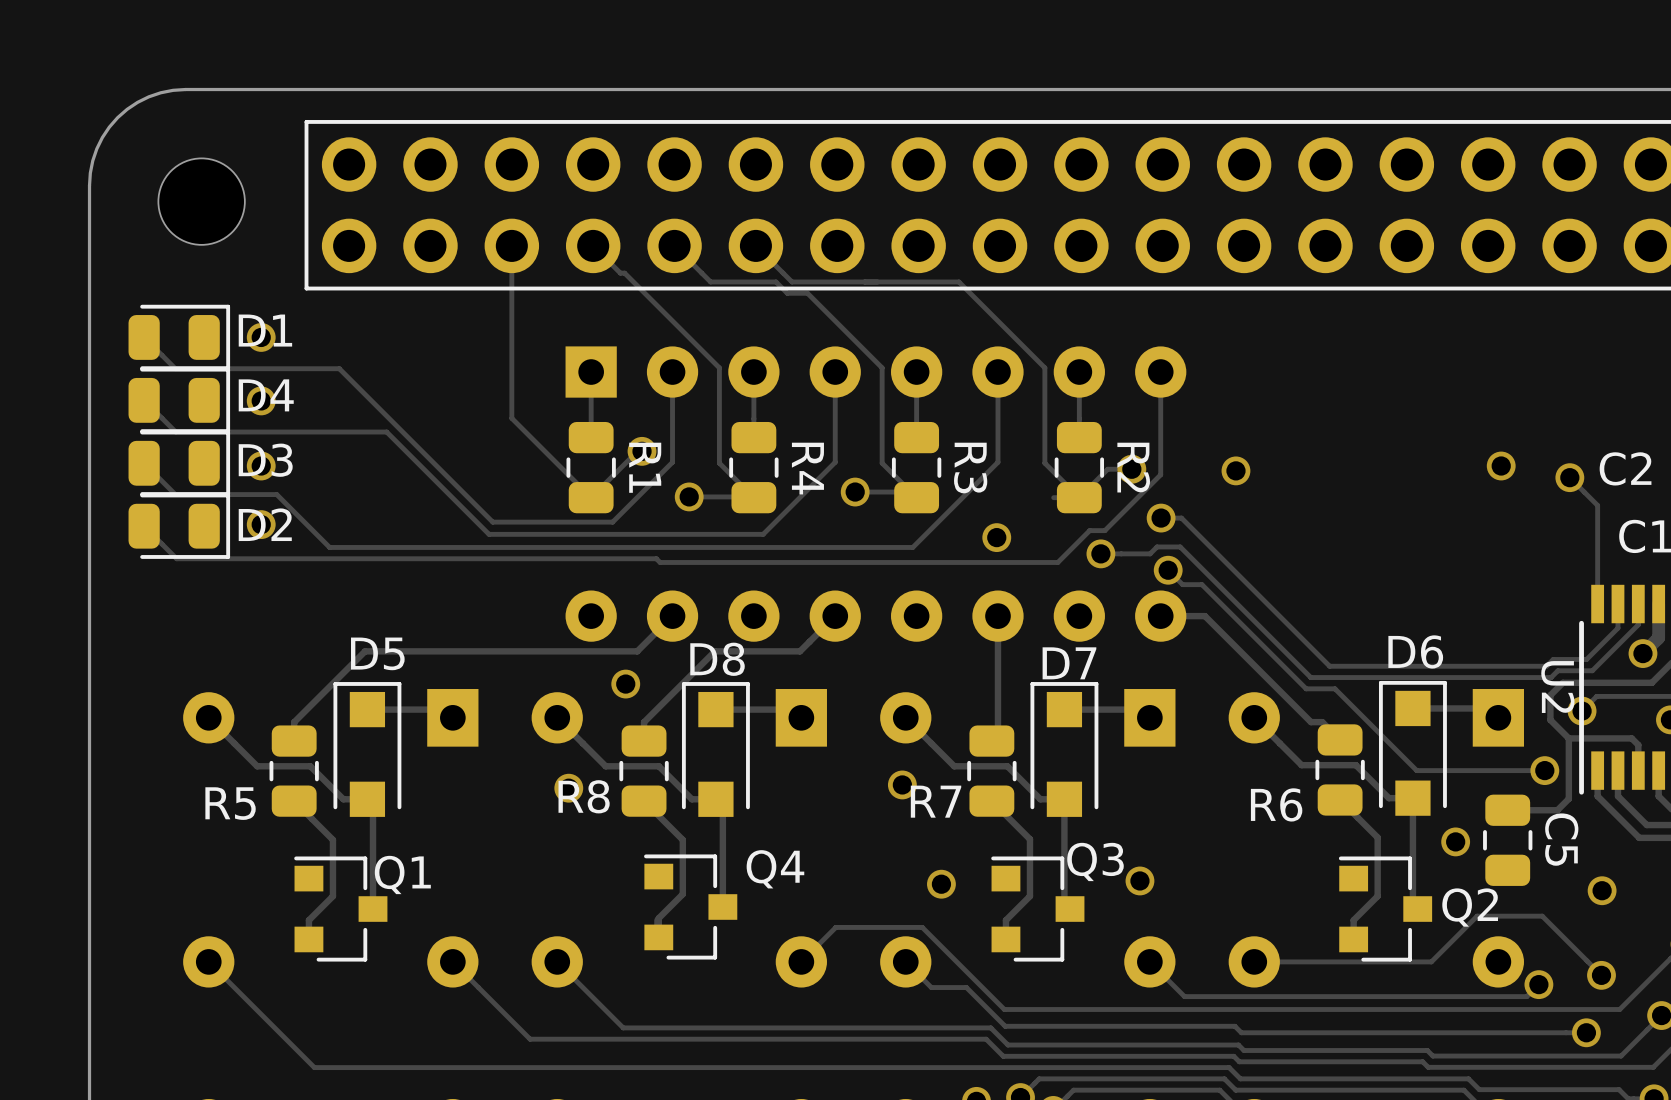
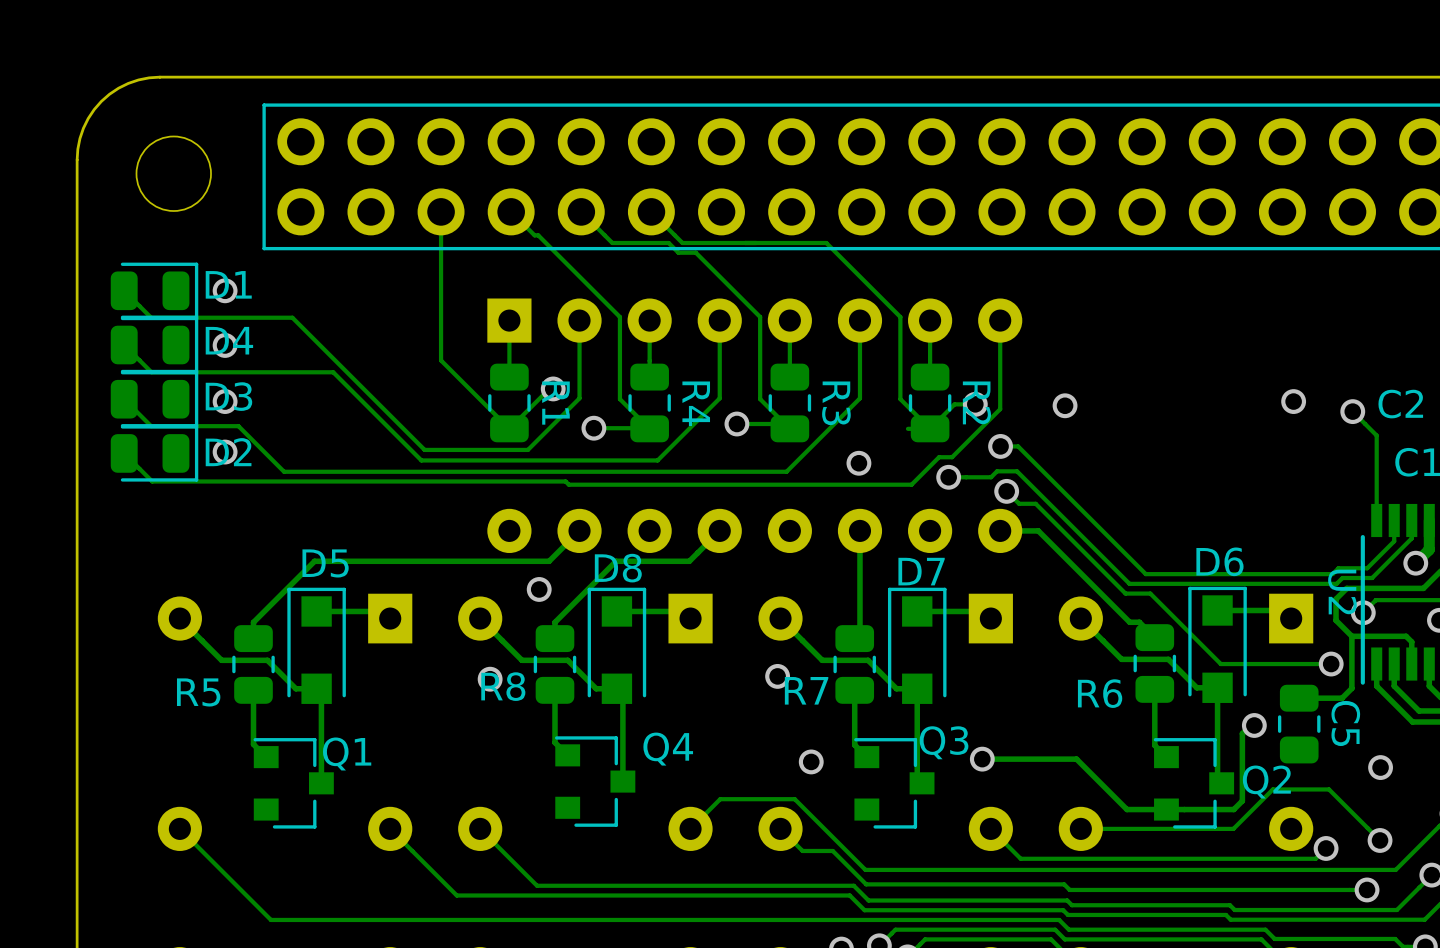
track: (1340, 800) (1377, 837) (1377, 896) (1353, 920) (1353, 939) -> (1154, 689) (1154, 745) (1166, 757)
track: (294, 801) (332, 839) (332, 896) (308, 920) (308, 939) -> (253, 690) (253, 744) (266, 757)
track: (644, 801) (682, 839) (682, 894) (658, 918) (658, 937) -> (554, 690) (554, 742) (567, 755)
track: (991, 801) (1029, 839) (1029, 896) (1005, 920) (1005, 939) -> (854, 690) (854, 744) (866, 757)
track: none -> (1254, 725) (1250, 725) (1242, 733) (1242, 800) (1233, 809) (1126, 809) (1076, 759) (982, 759)

